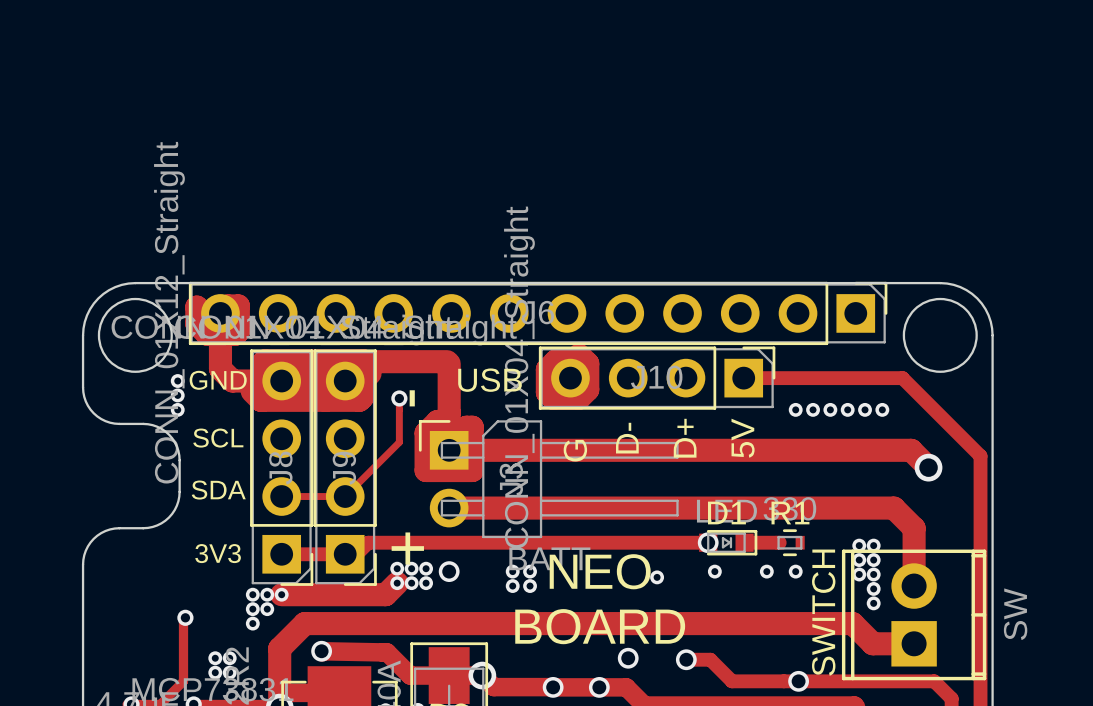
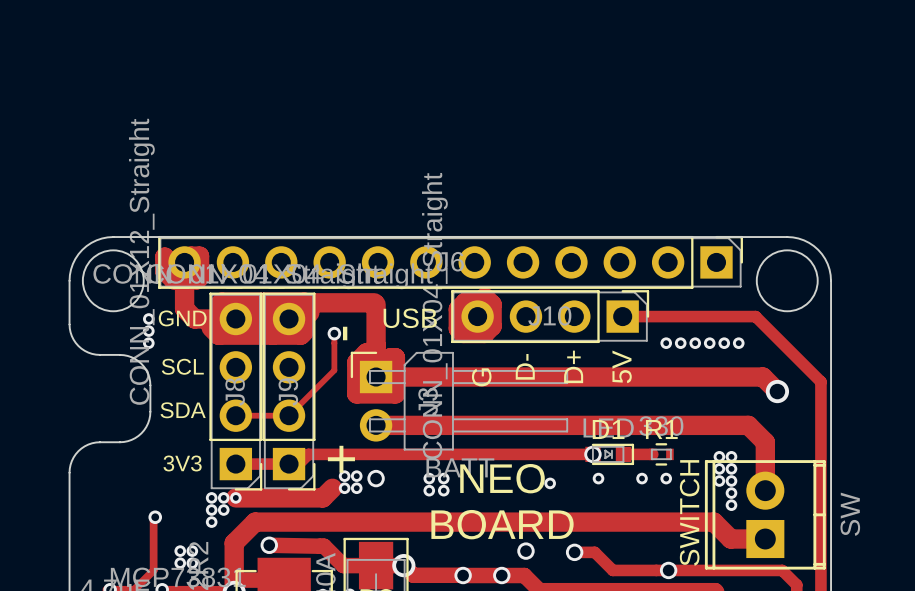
via: (397, 568) -> none
via: (397, 583) -> none

